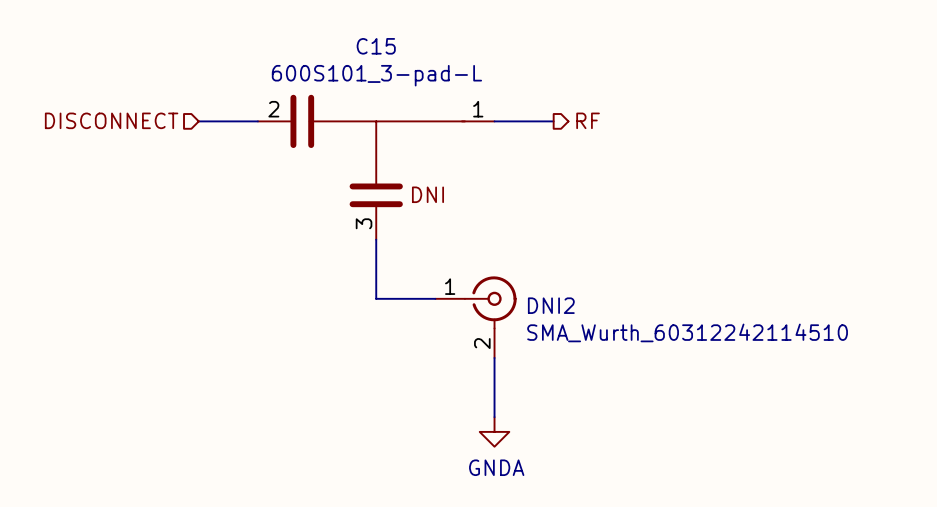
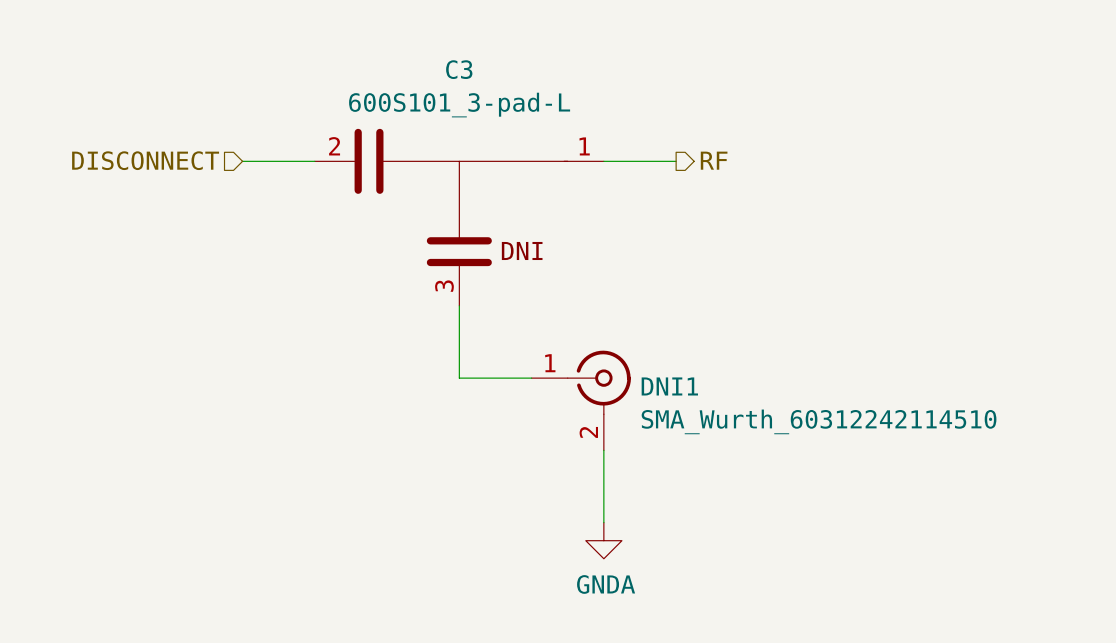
C15 name: C15 (376, 46) -> C3 (459, 69)
DNI2 name: DNI2 (551, 305) -> DNI1 (669, 386)

